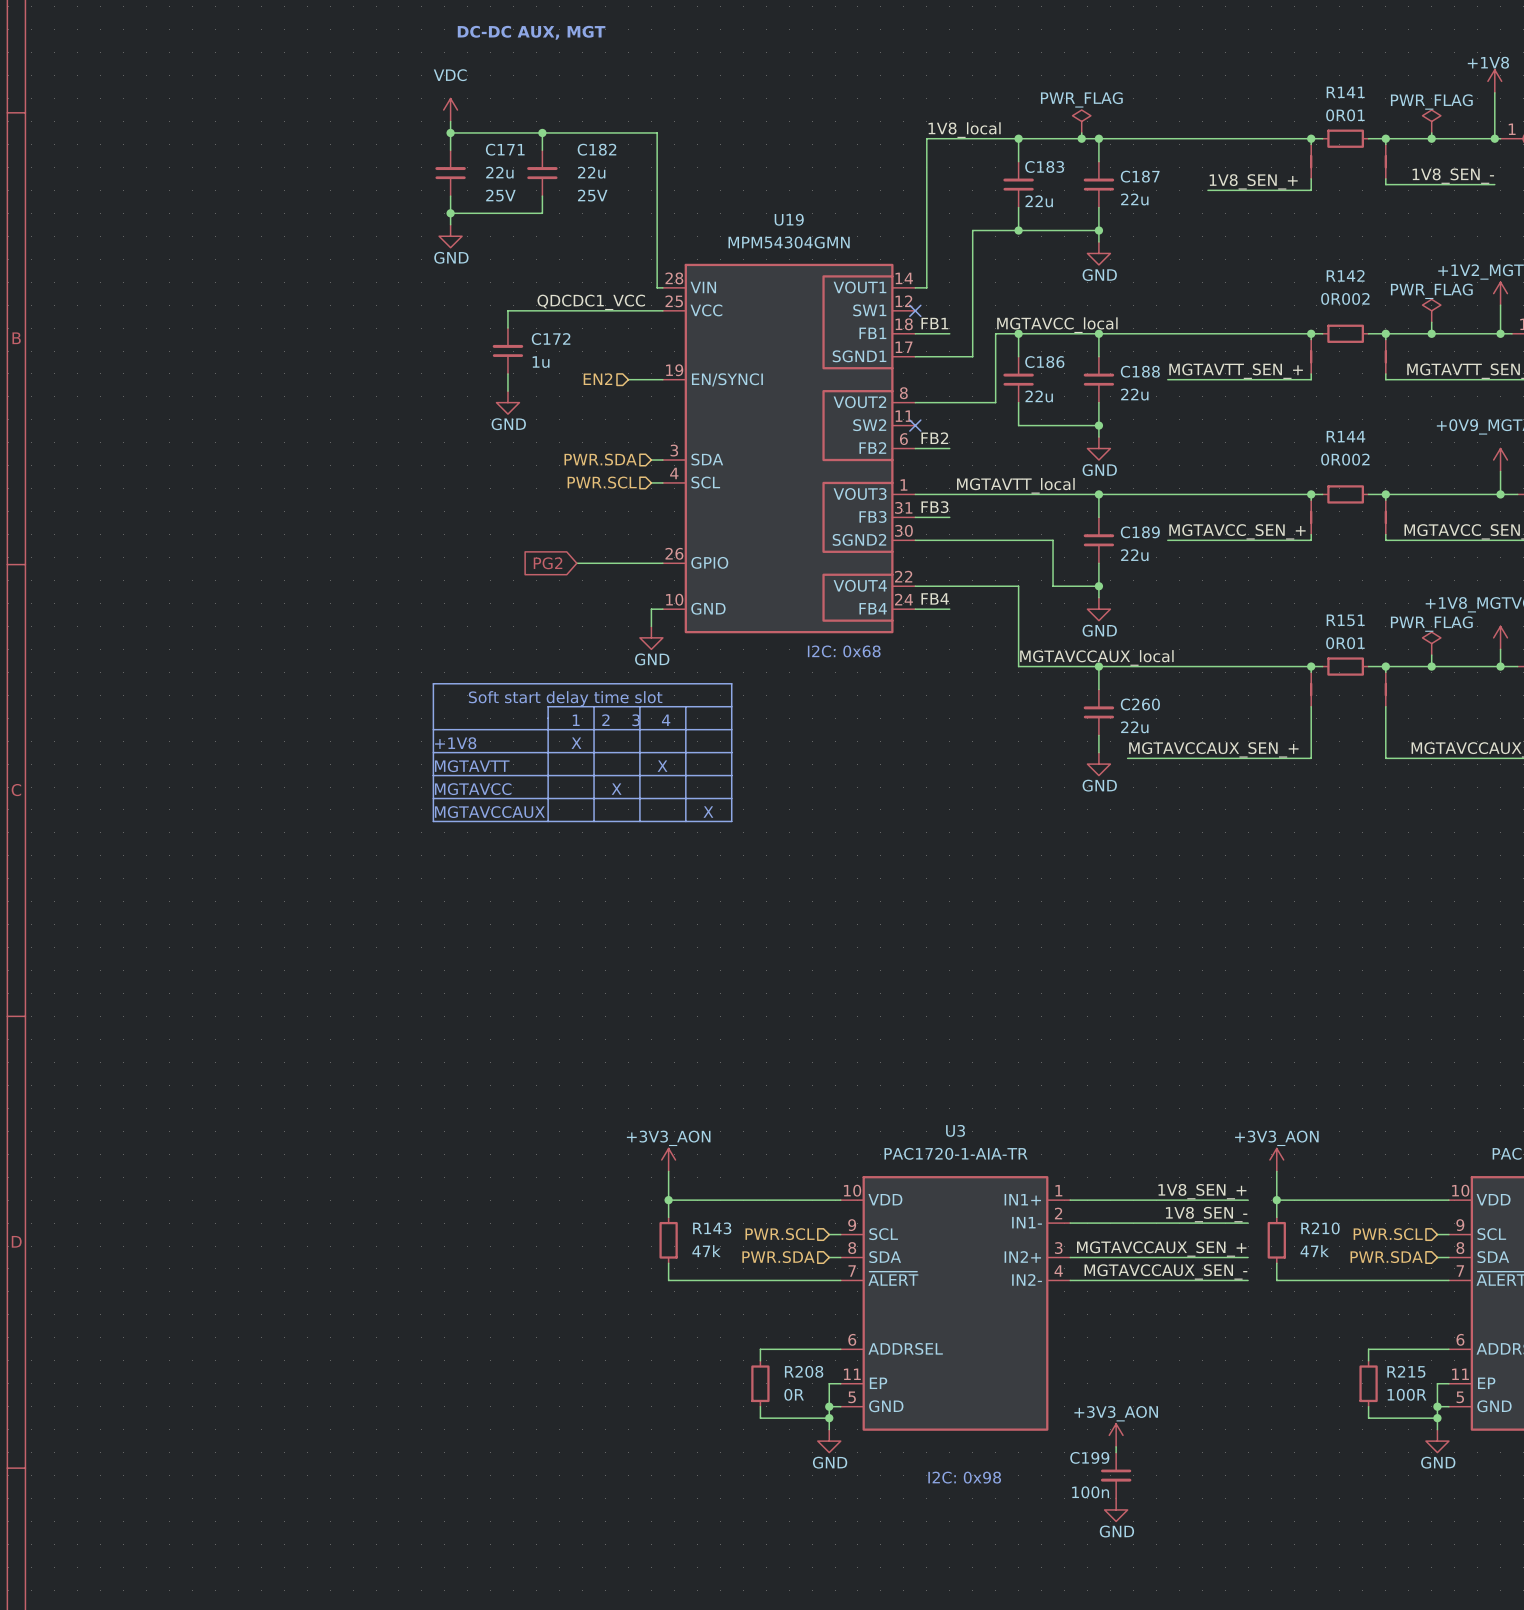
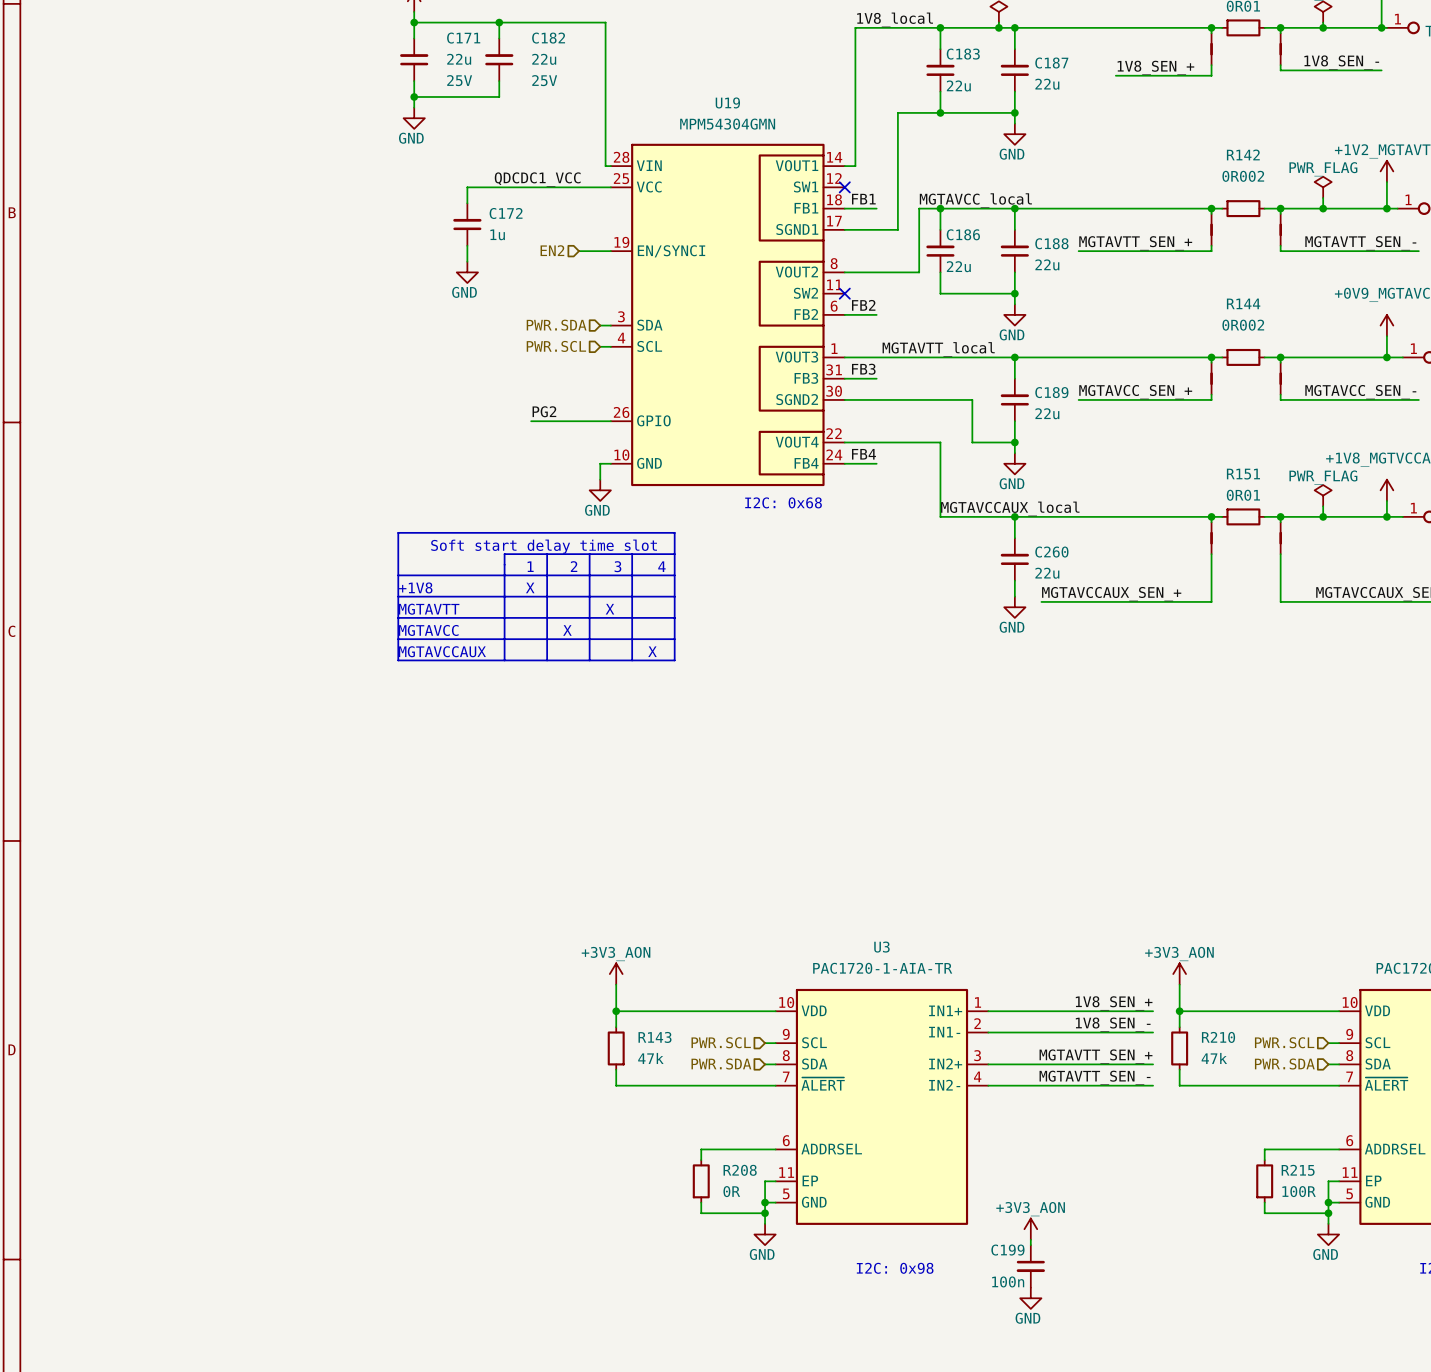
label: none -> PG2 (544, 411)
global label: PG2 (548, 563) -> none
label: MGTAVCCAUX_SEN_+ (1161, 1249) -> MGTAVTT_SEN_+ (1096, 1056)
label: MGTAVCCAUX_SEN_- (1165, 1271) -> MGTAVTT_SEN_- (1095, 1077)

